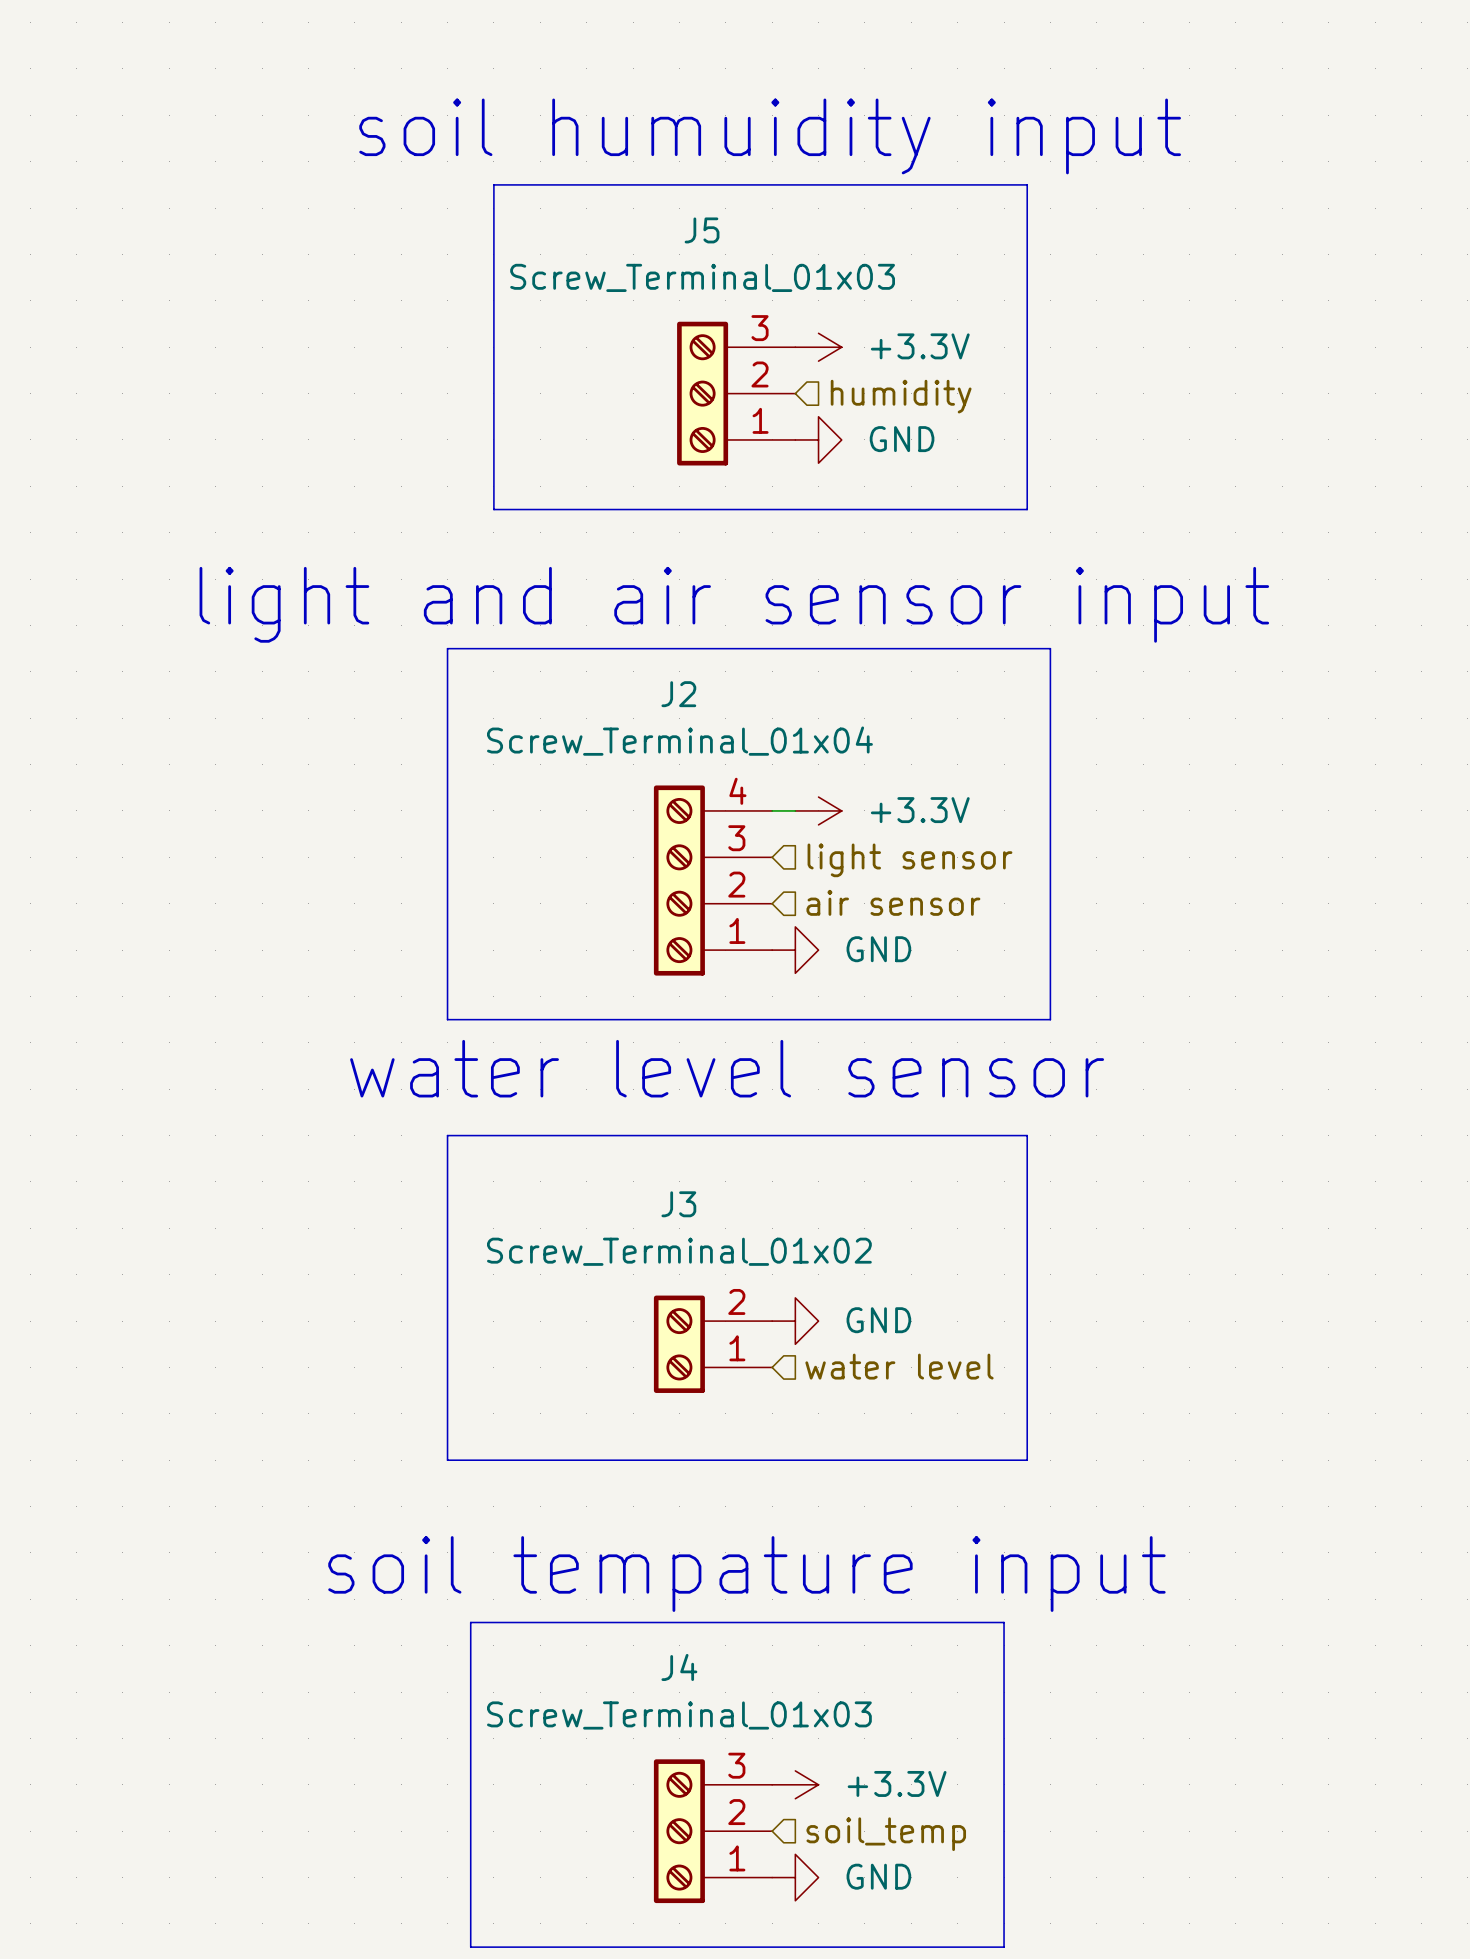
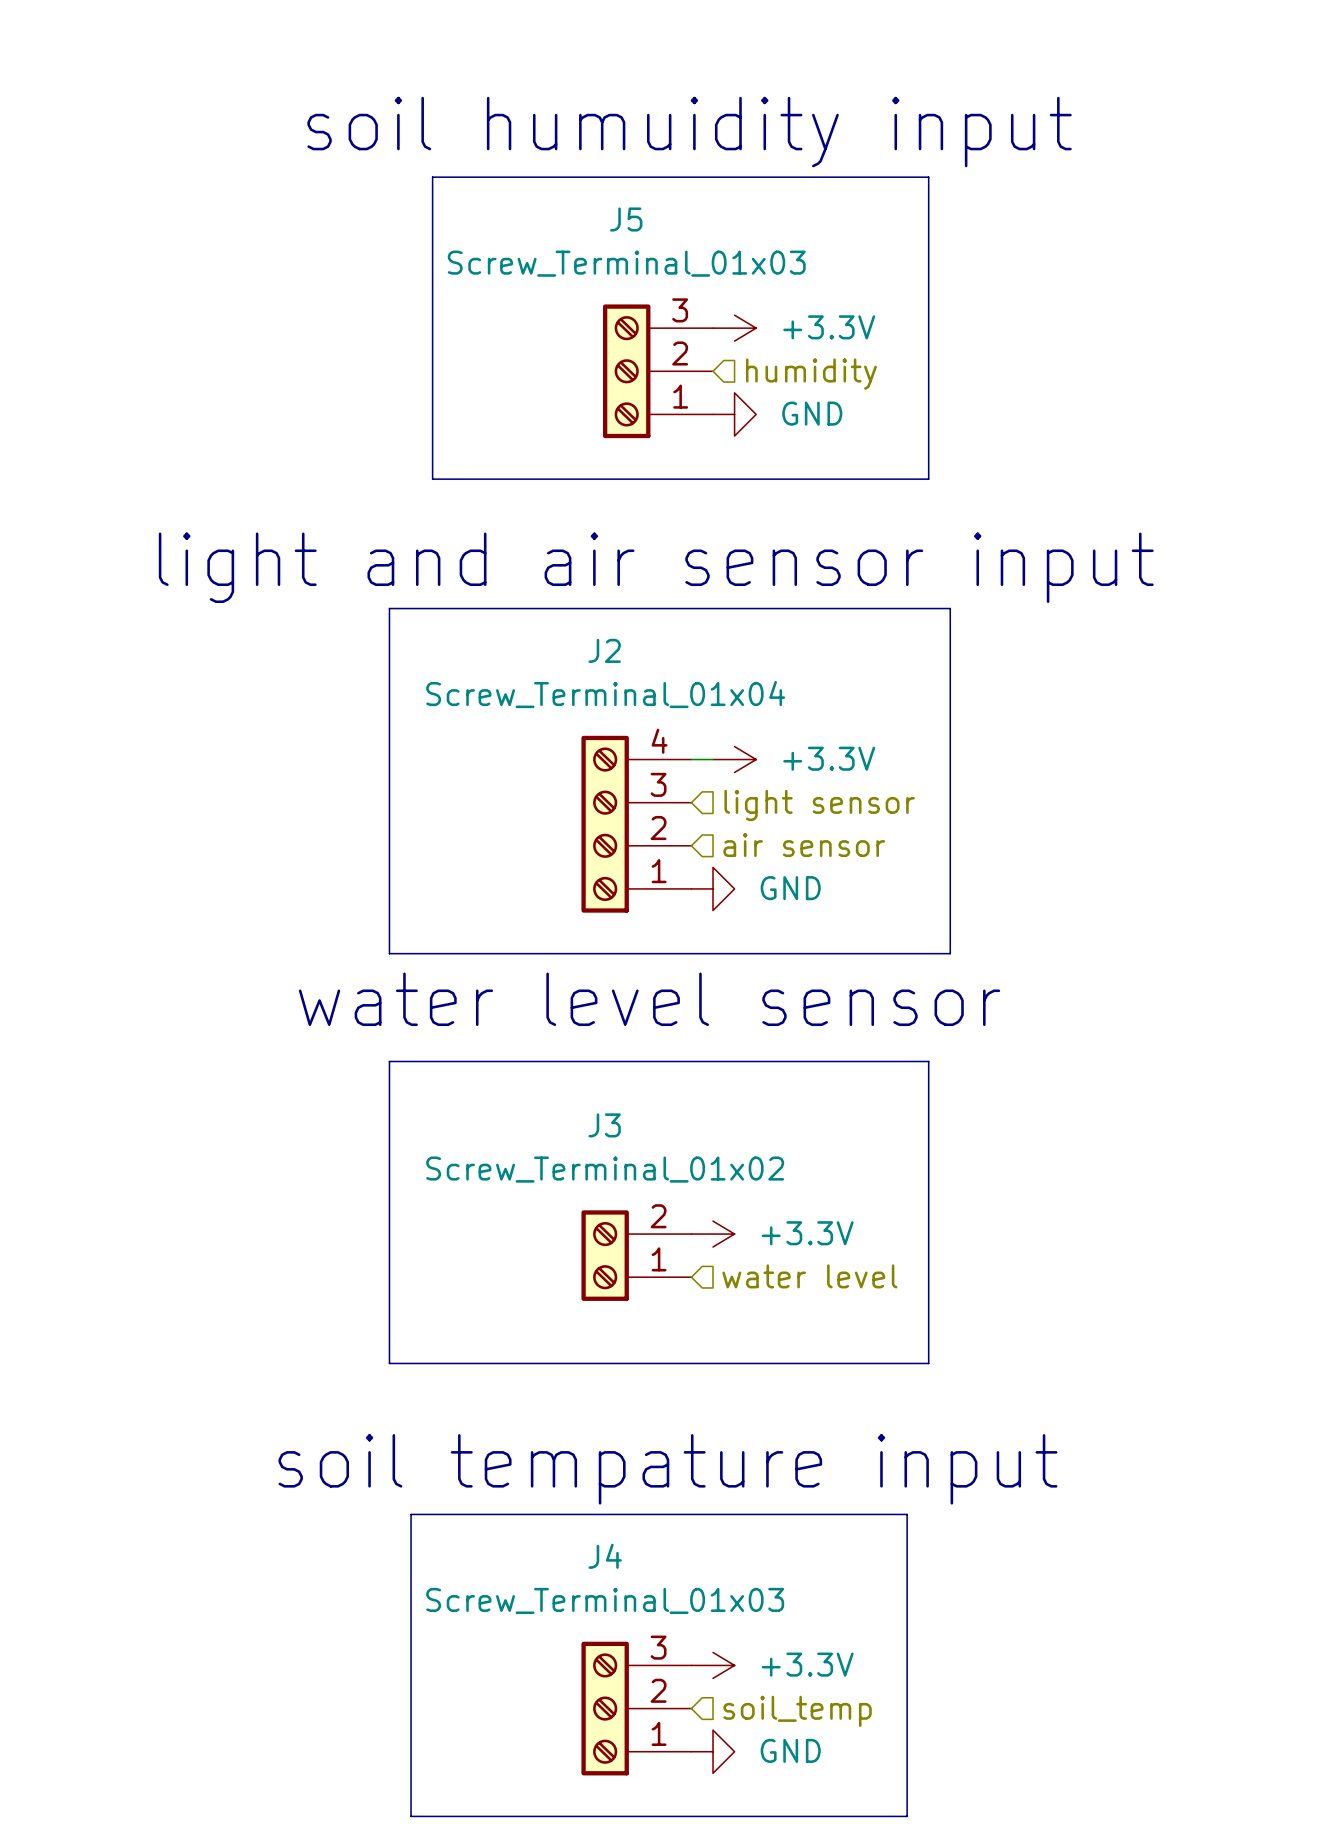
power symbol: GND (795, 1321) -> +3.3V (713, 1234)

